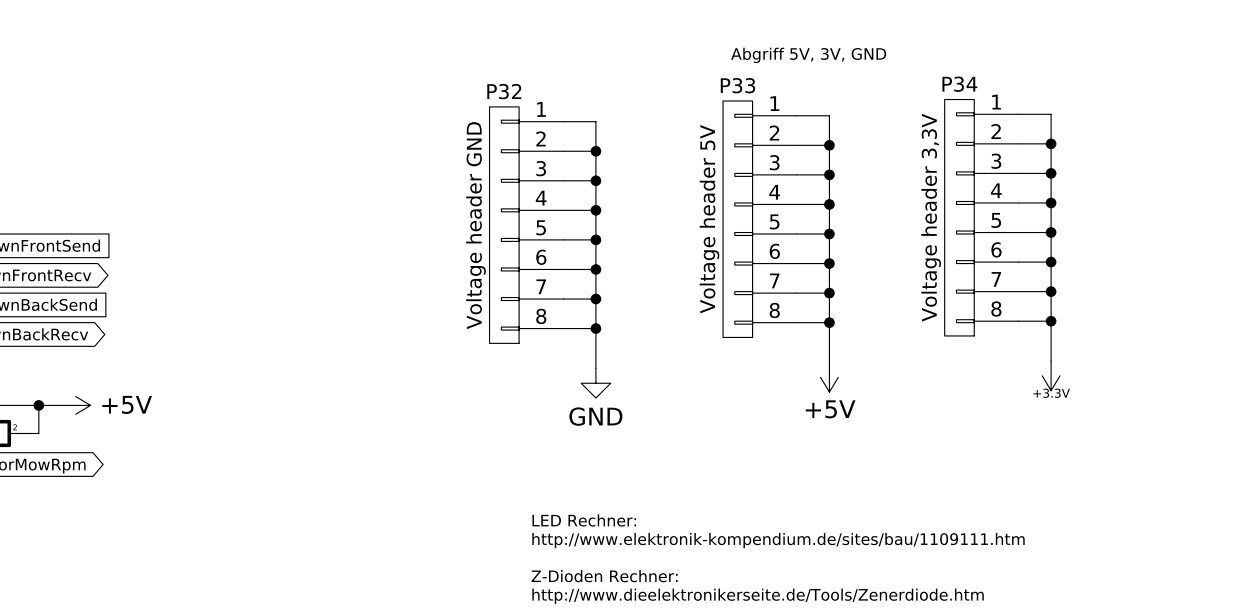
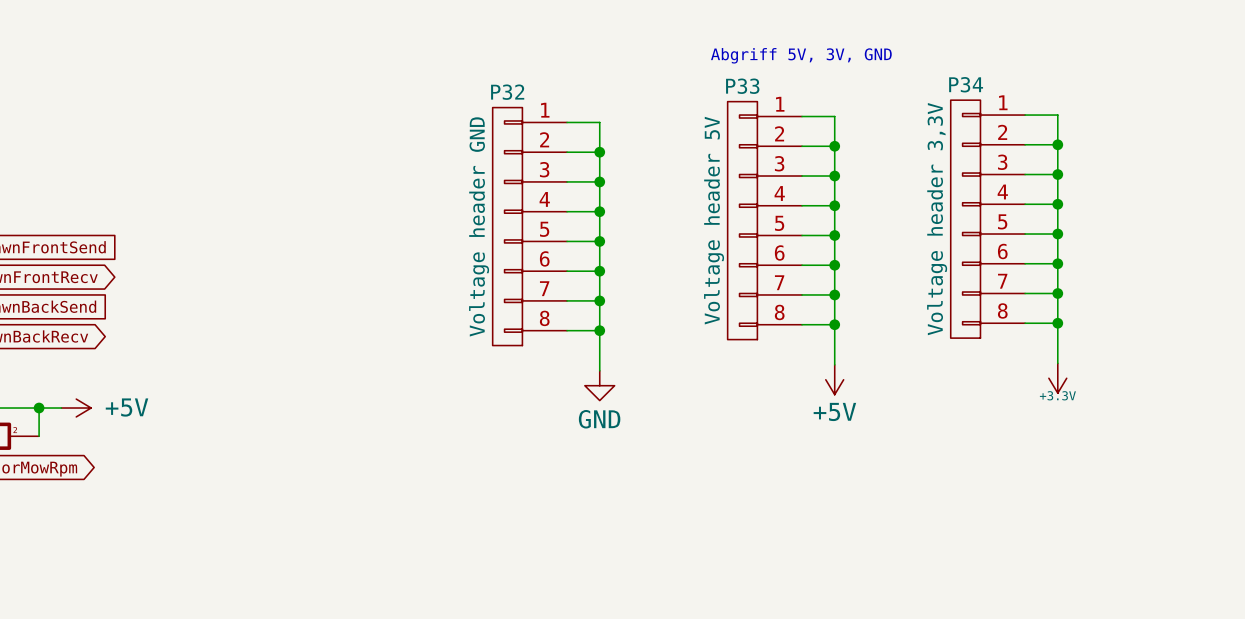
text: LED Rechner: (584, 520) -> none
text: http://www.elektronik-kompendium.de/sites/bau/1109111.htm (778, 540) -> none
text: Z-Dioden Rechner: (604, 576) -> none
text: http://www.dieelektronikerseite.de/Tools/Zenerdiode.htm (758, 596) -> none

